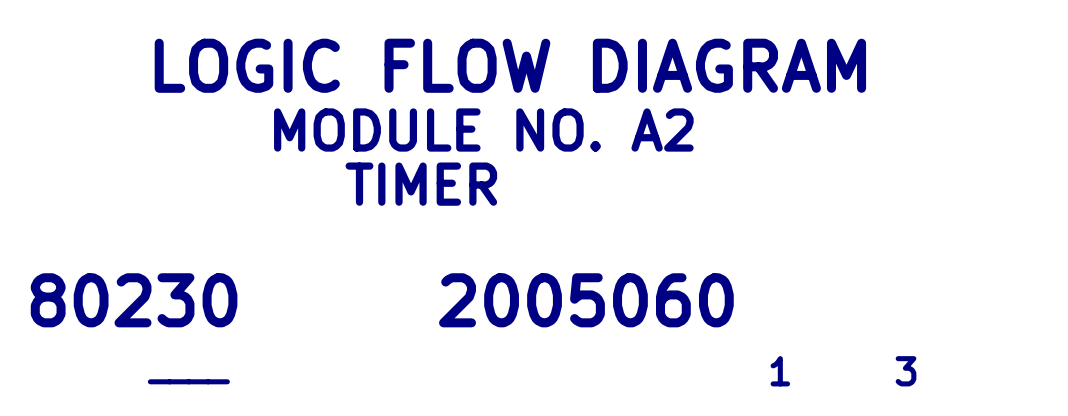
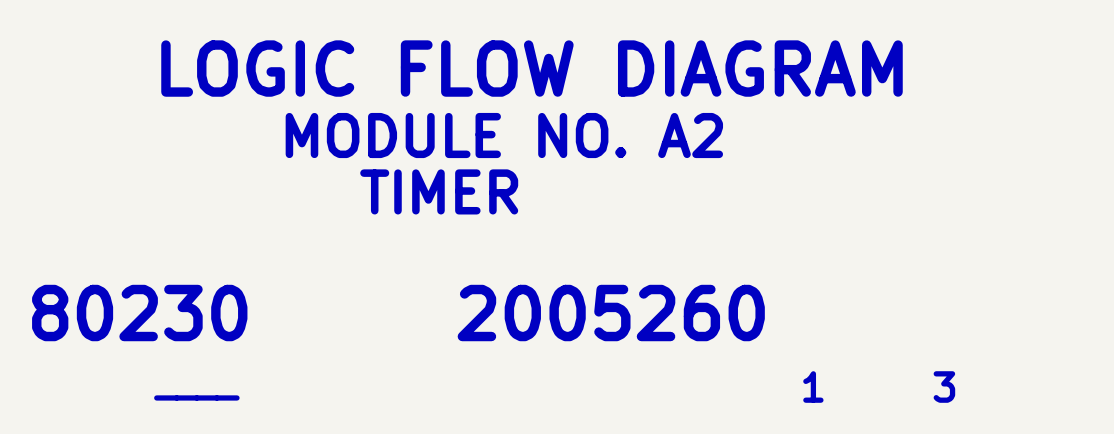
text: 2005060 (586, 300) -> 2005260 (611, 313)

